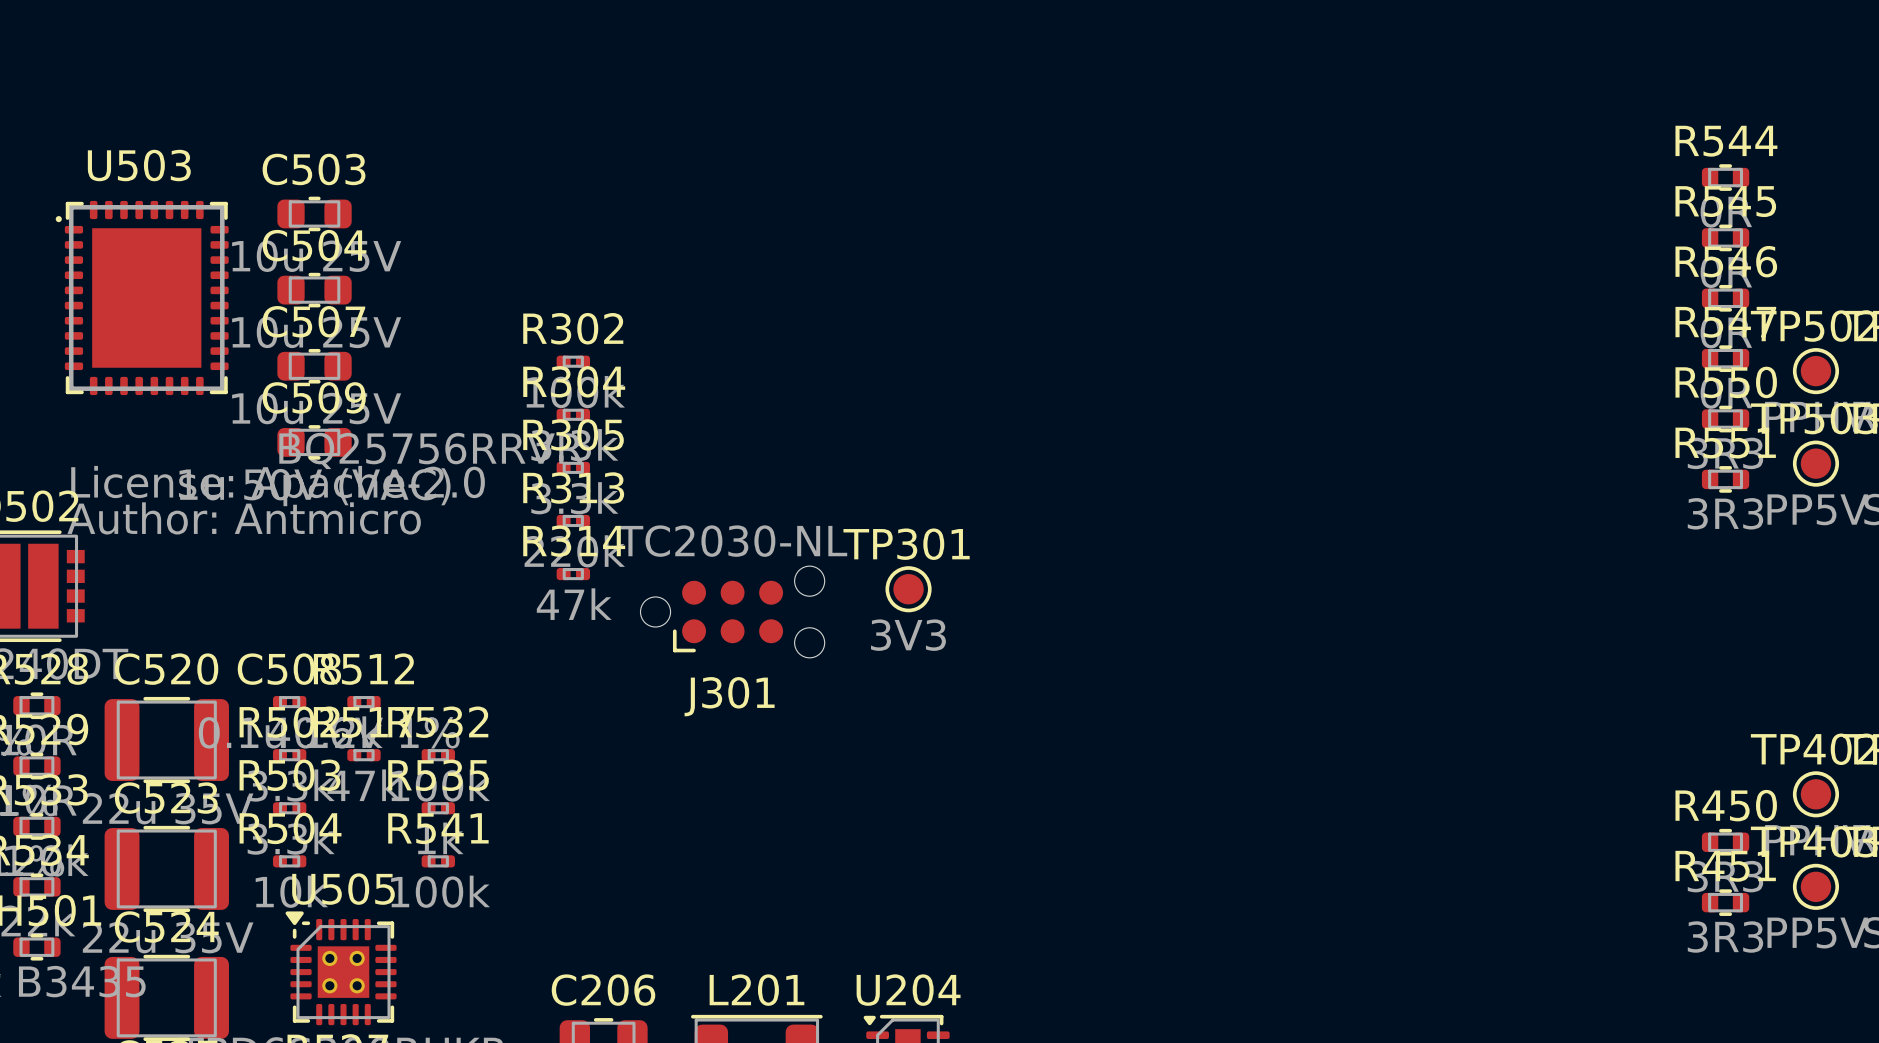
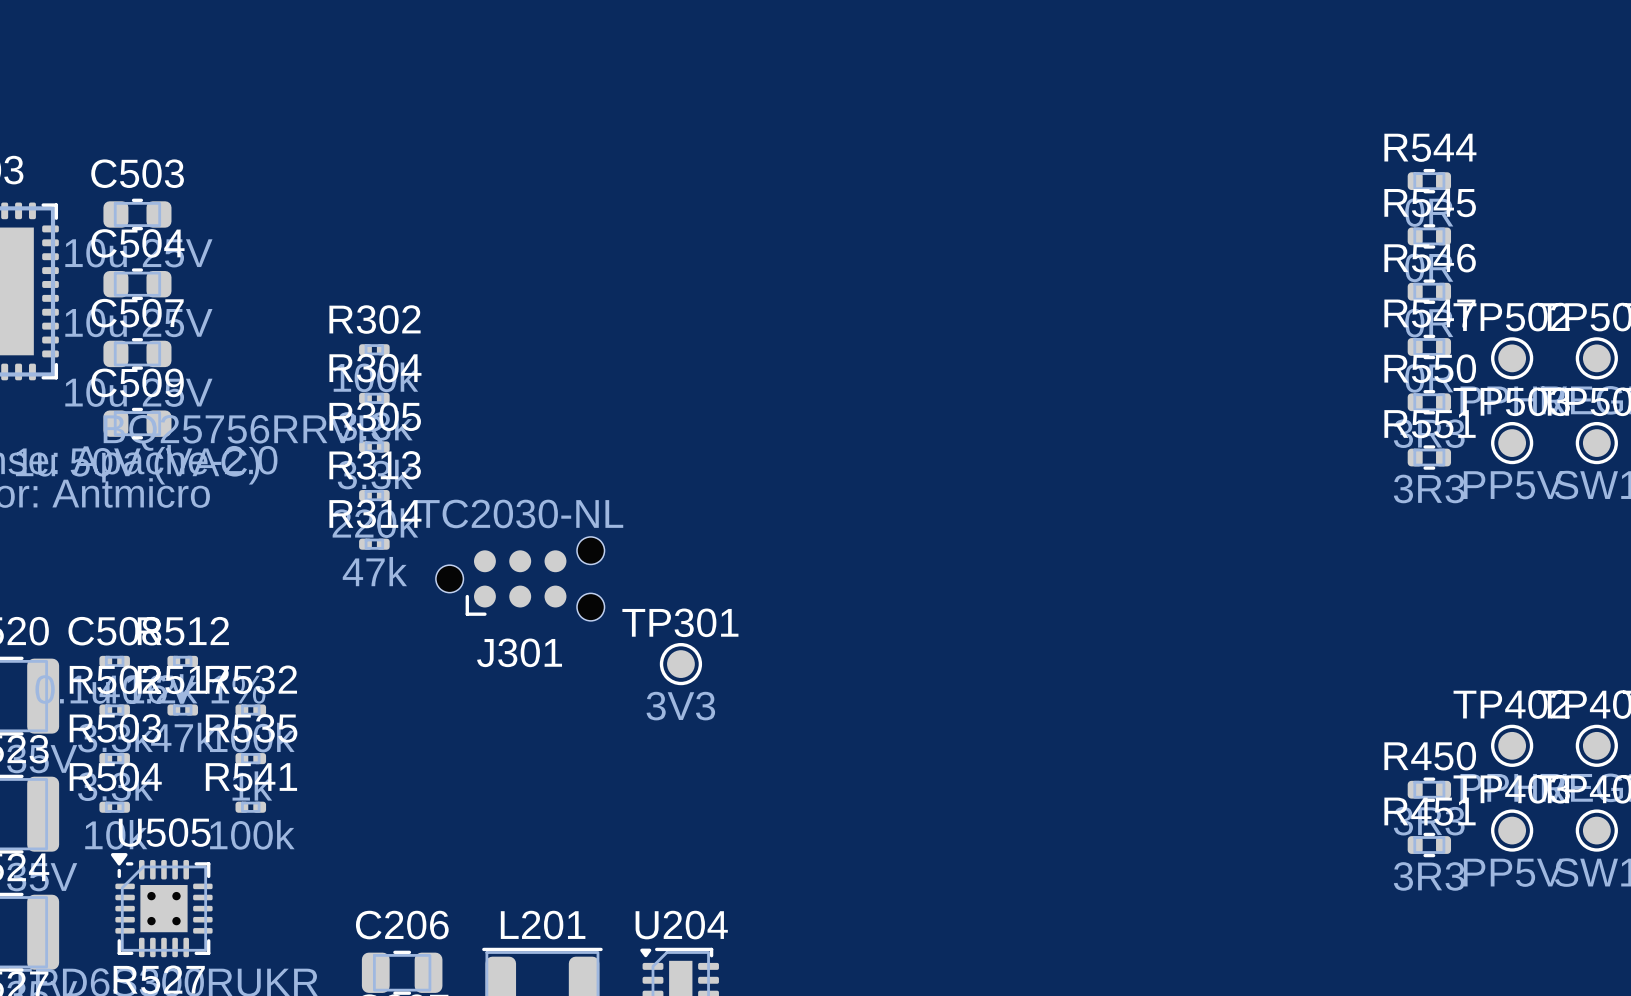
TP301 position: (908, 589) -> (680, 664)

